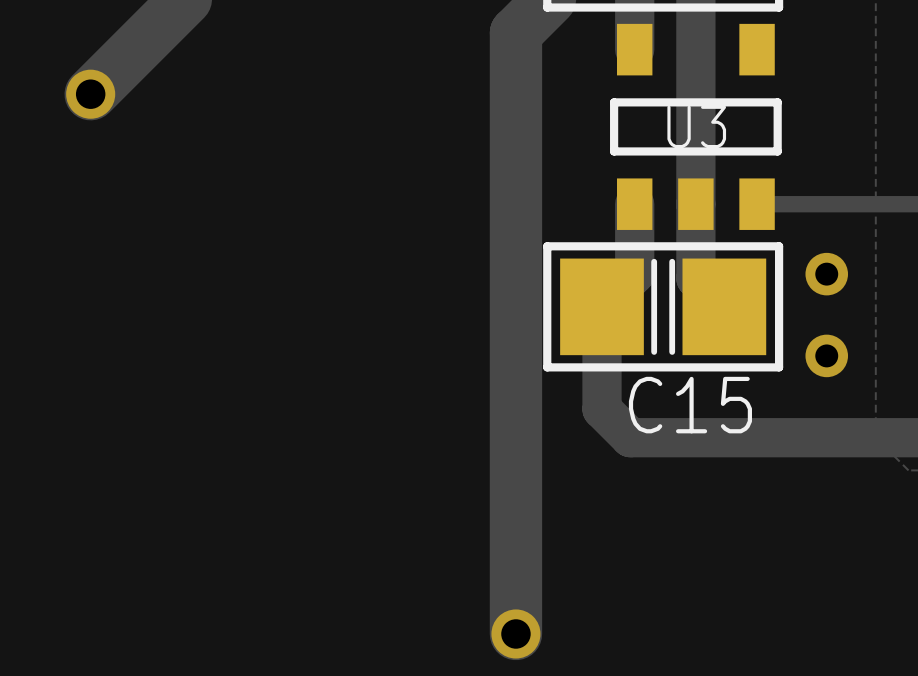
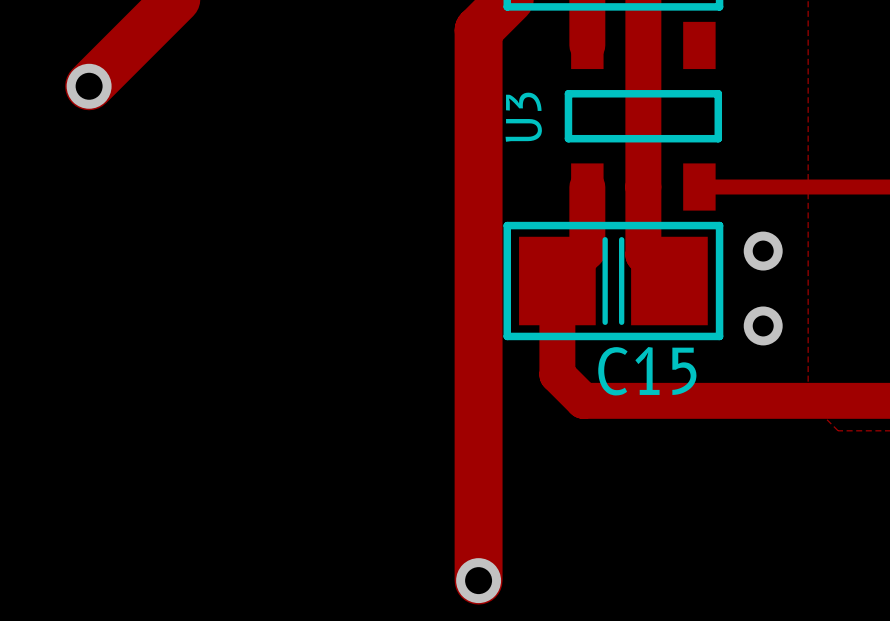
U3 name rotation: 0° (696, 126) -> 90° counterclockwise (523, 117)
U3 name position: U3 (696, 126) -> U3 (523, 117)

